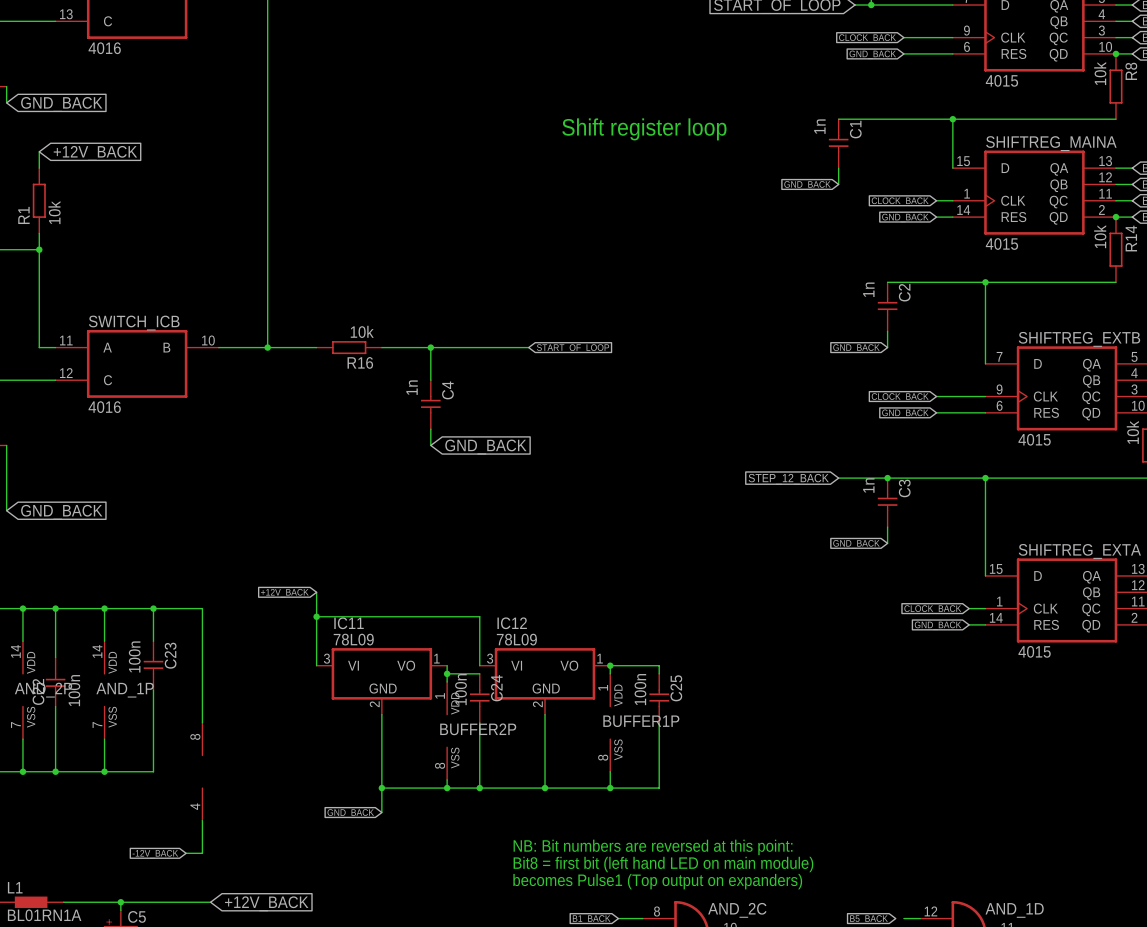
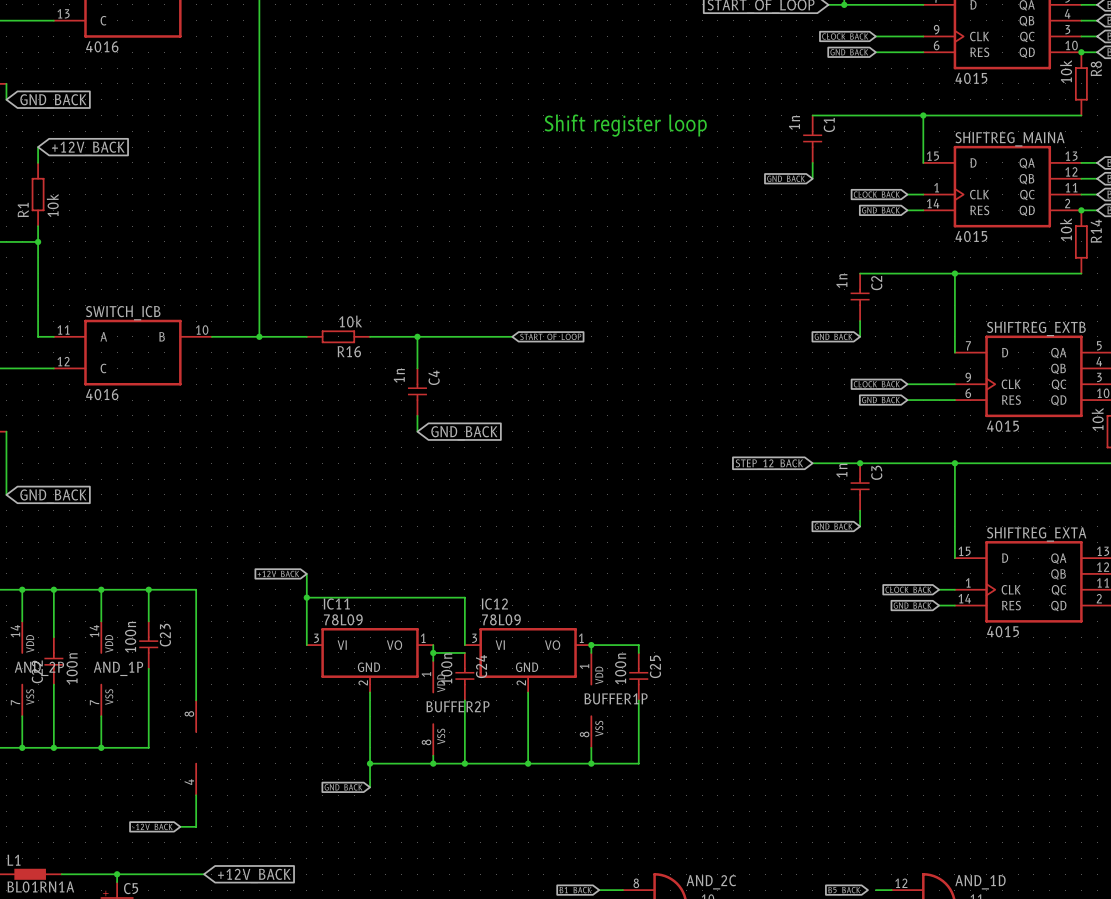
text: NB: Bit numbers are reversed at this point: (653, 847) -> none
text: Bit8 = first bit (left hand LED on main module) (663, 864) -> none
text: becomes Pulse1 (Top output on expanders) (657, 881) -> none

